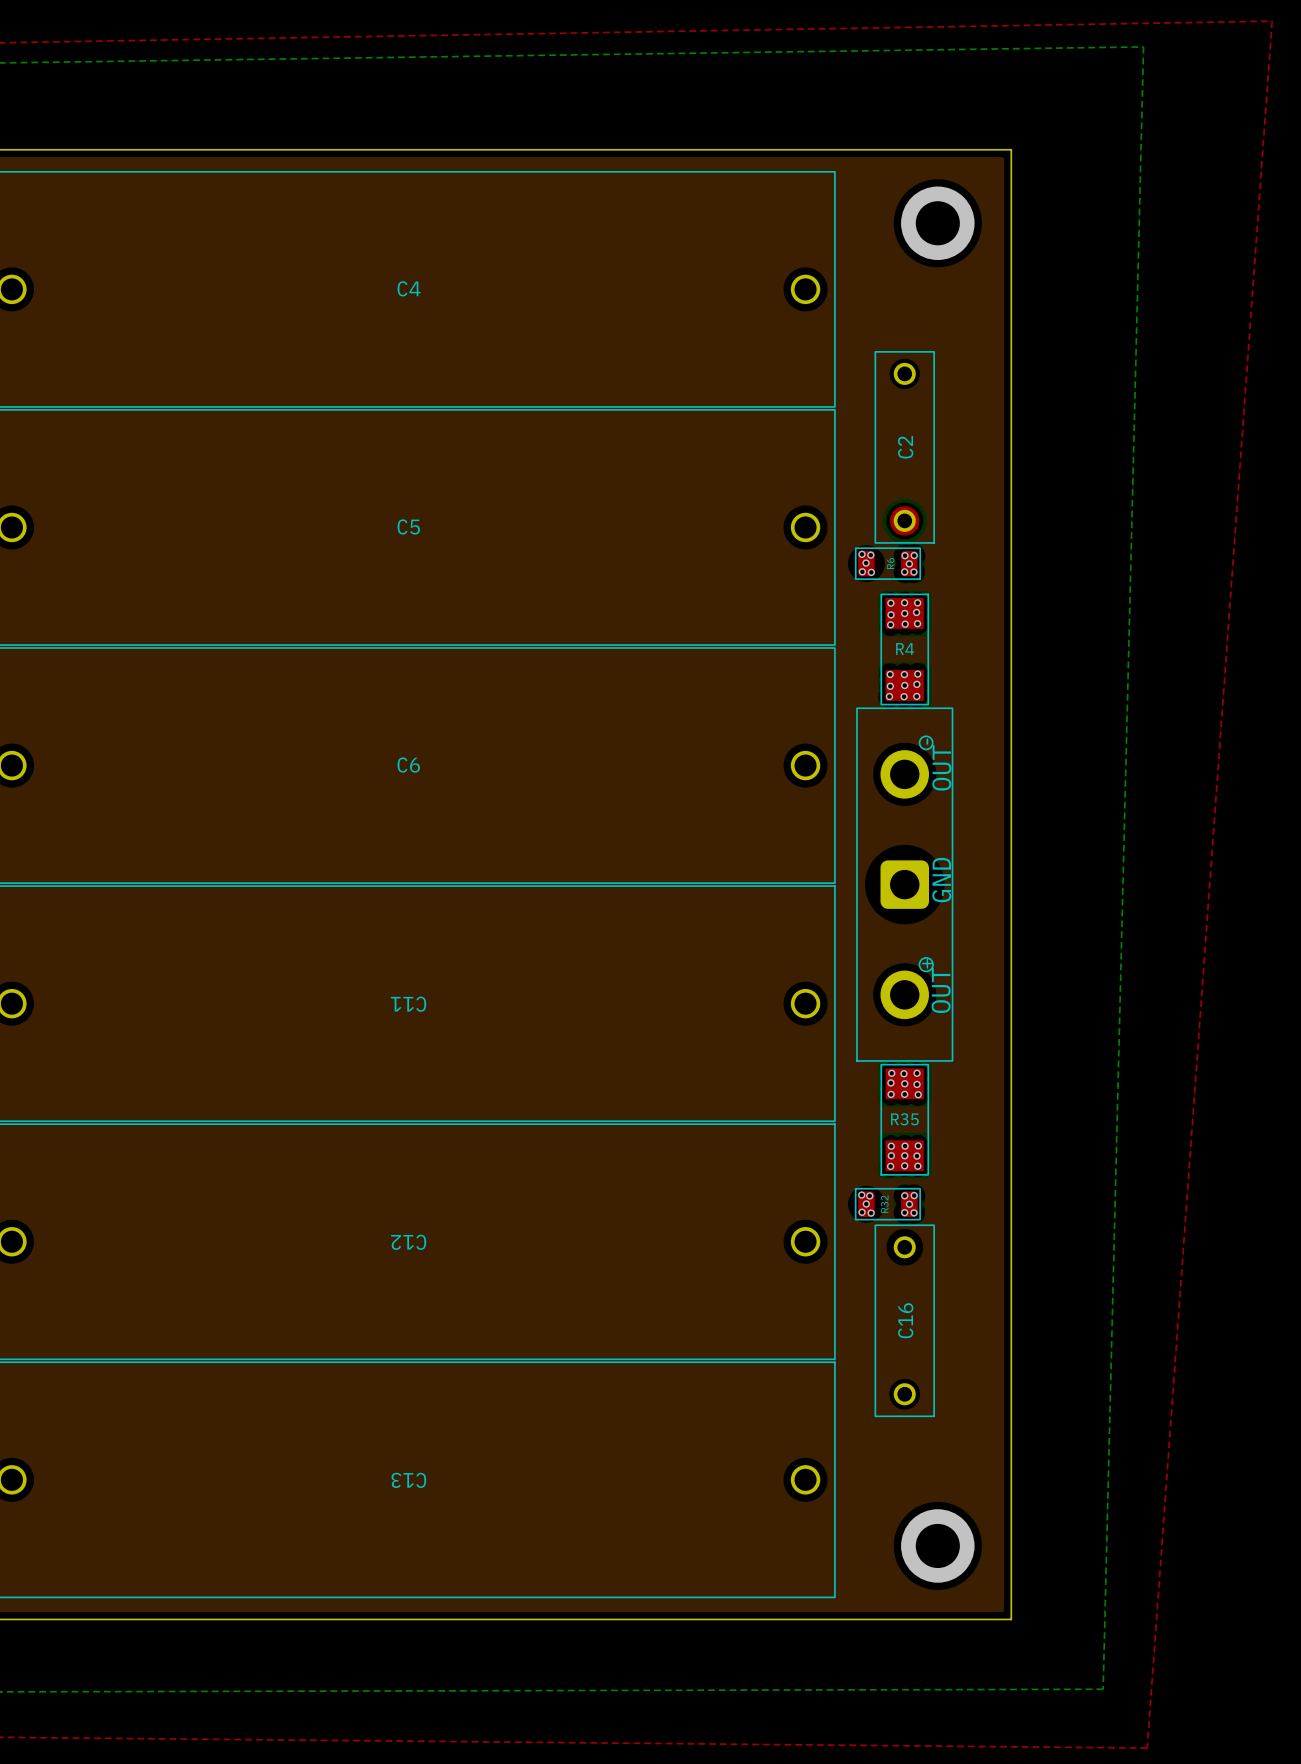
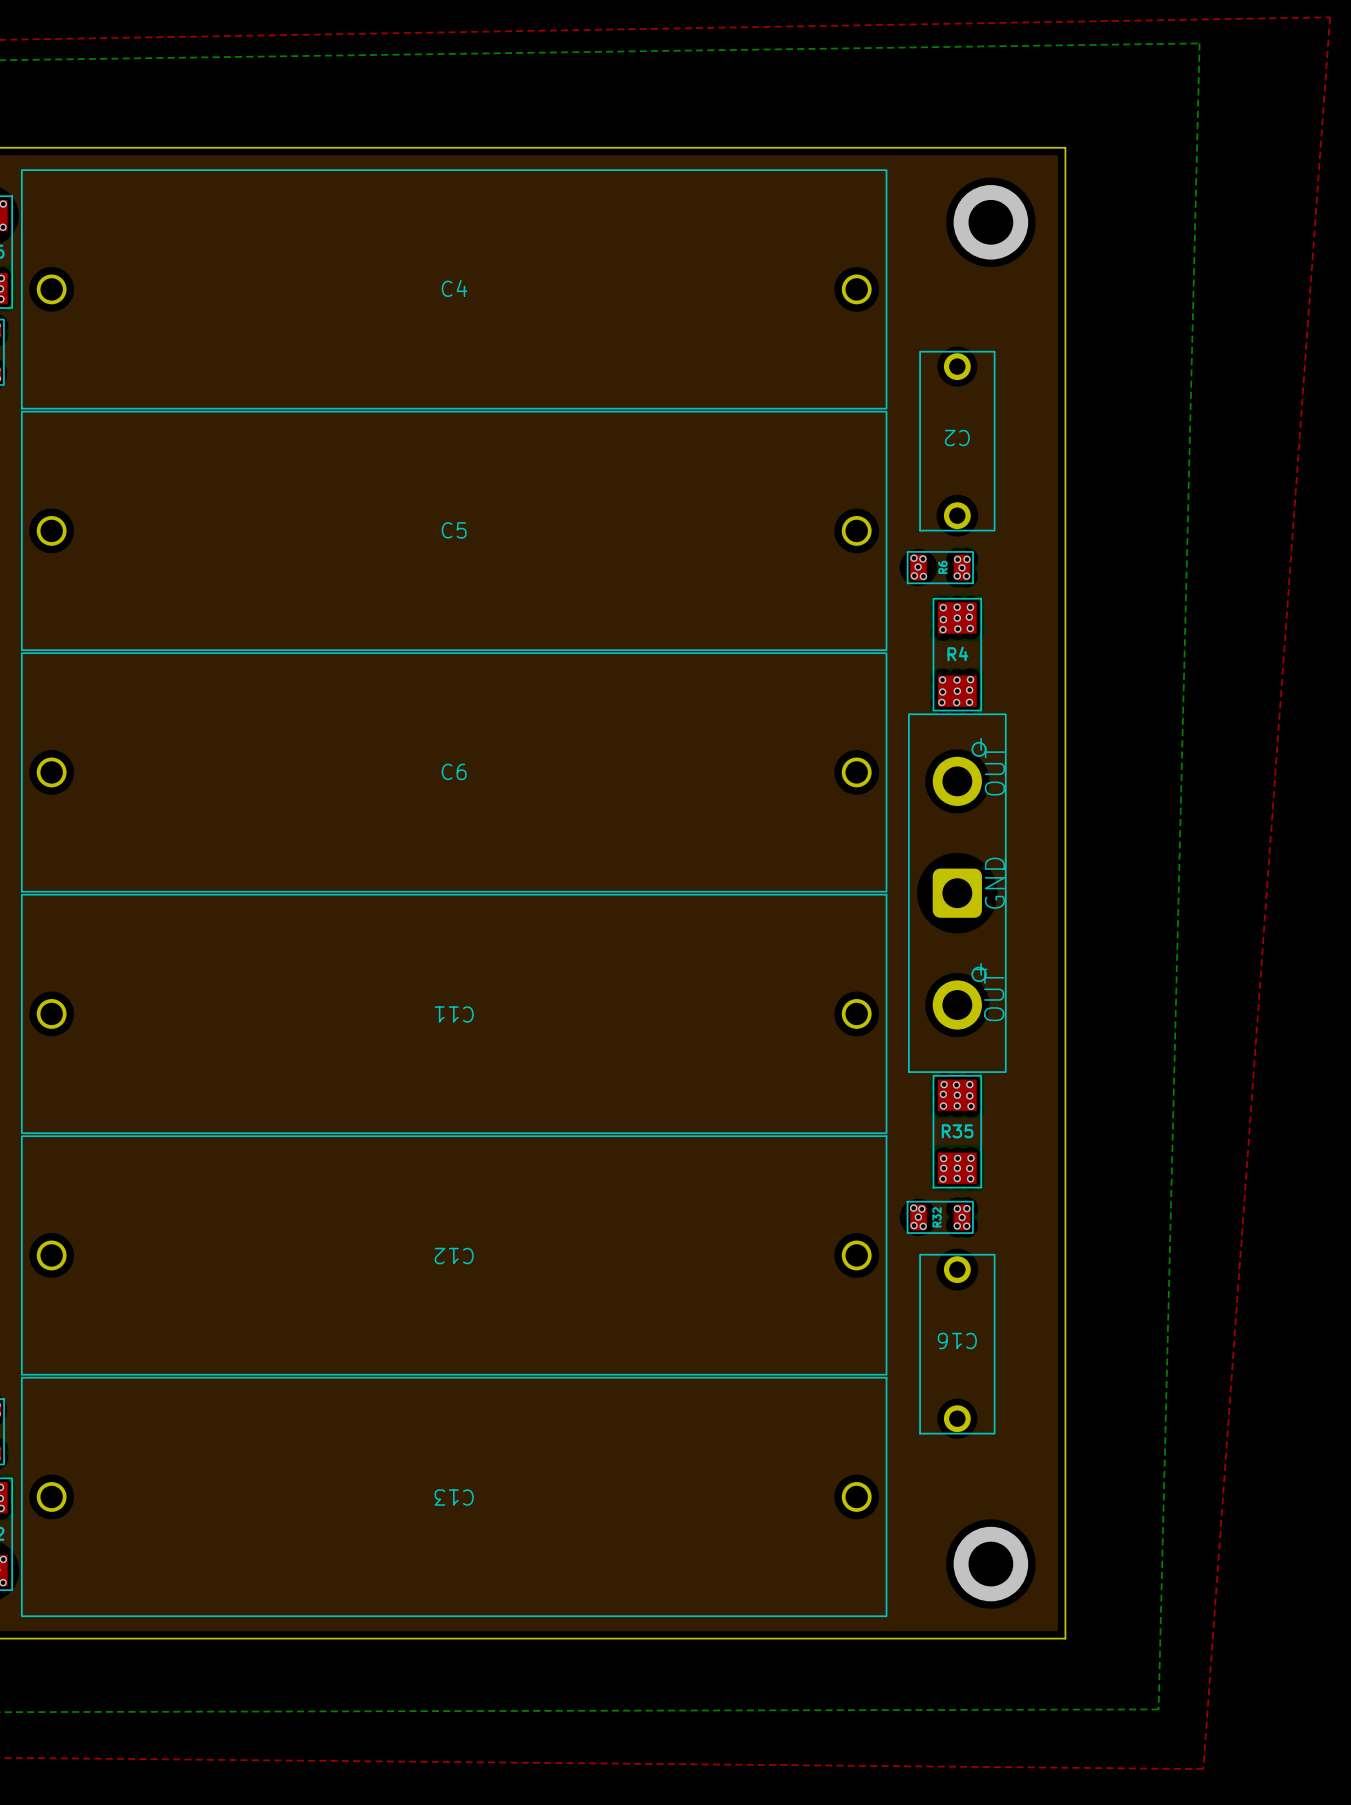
C2 footprint: [874, 351, 935, 544] -> [919, 350, 996, 532]
C16 footprint: [874, 1224, 935, 1418] -> [919, 1253, 996, 1435]

